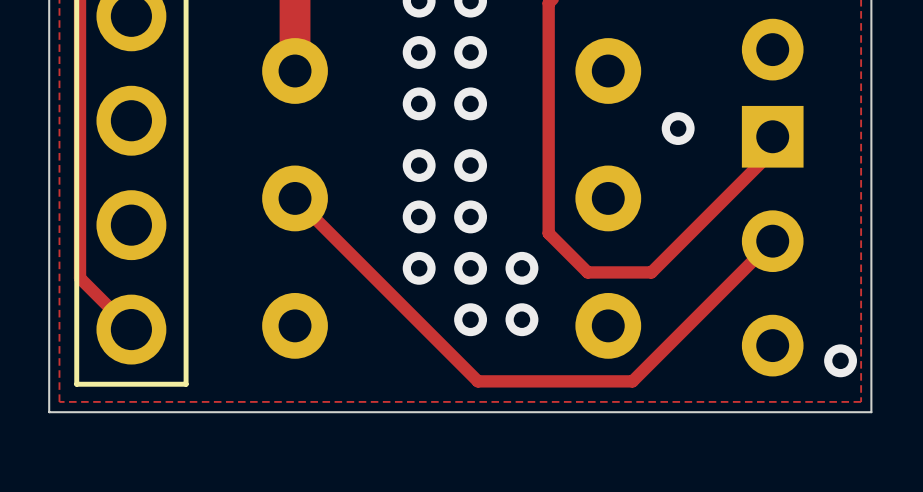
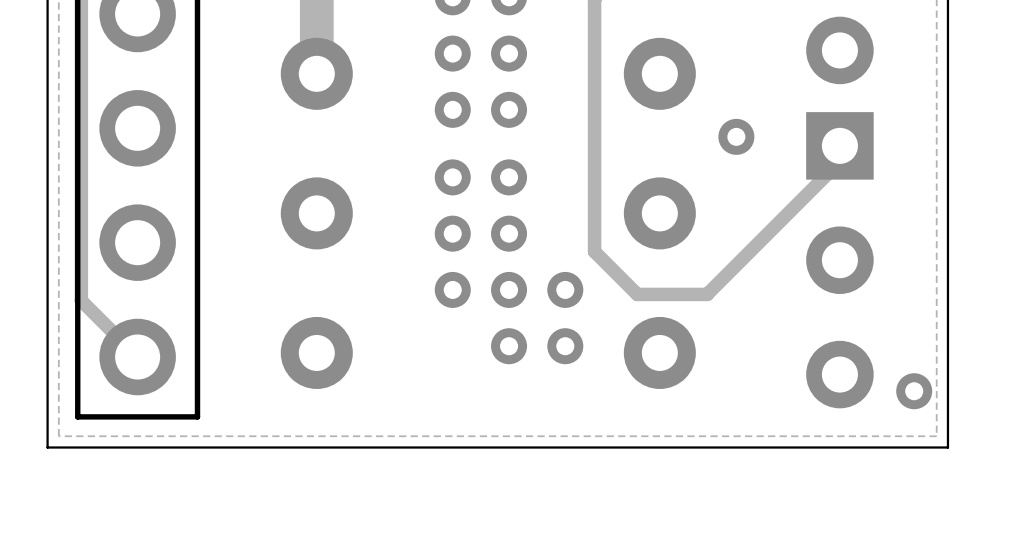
track: (295, 198) (477, 381) (632, 381) (772, 241) -> none

